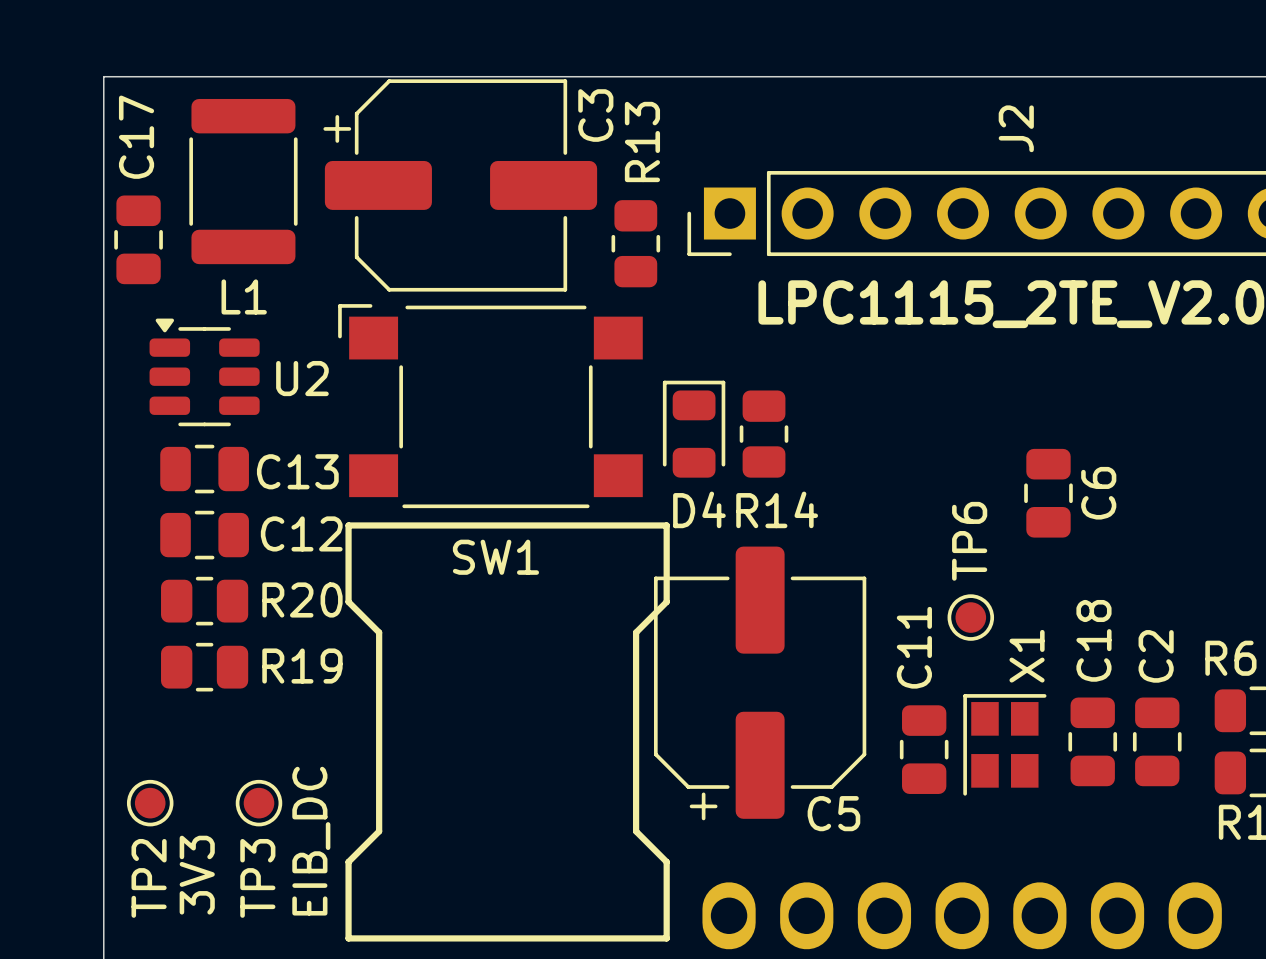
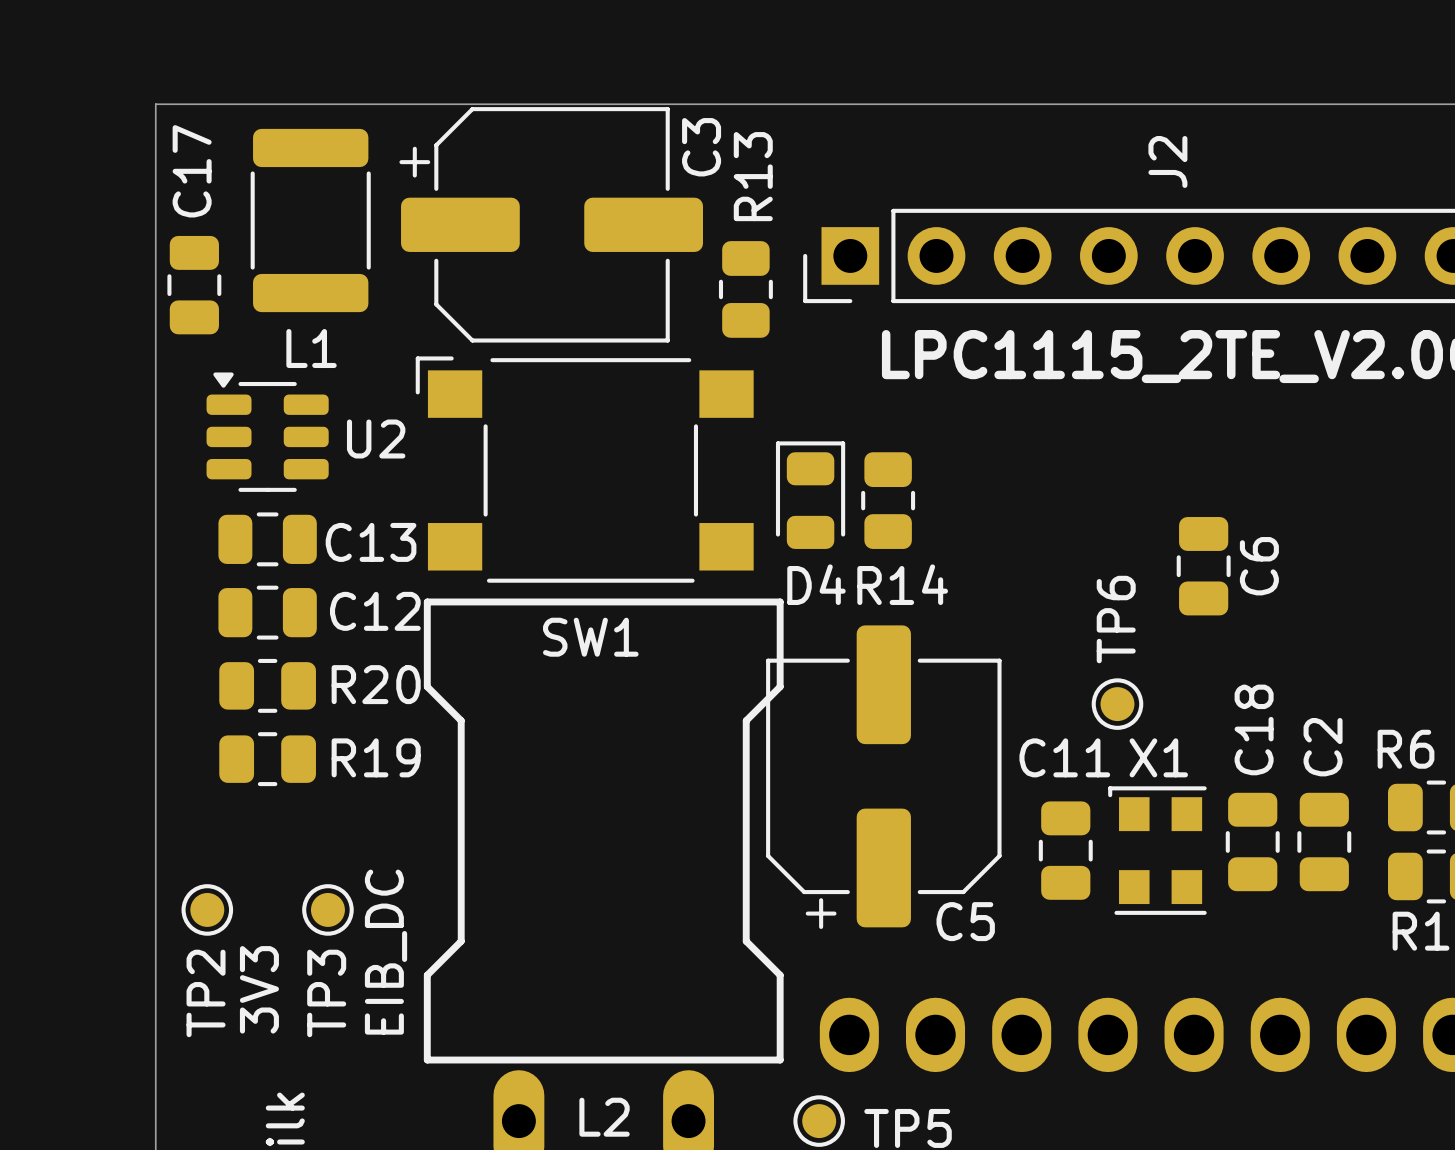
C11 name rotation: 0° (914, 647) -> 90° clockwise (1064, 757)
X1 footprint: [963, 694, 1047, 796] -> [1108, 786, 1207, 915]

